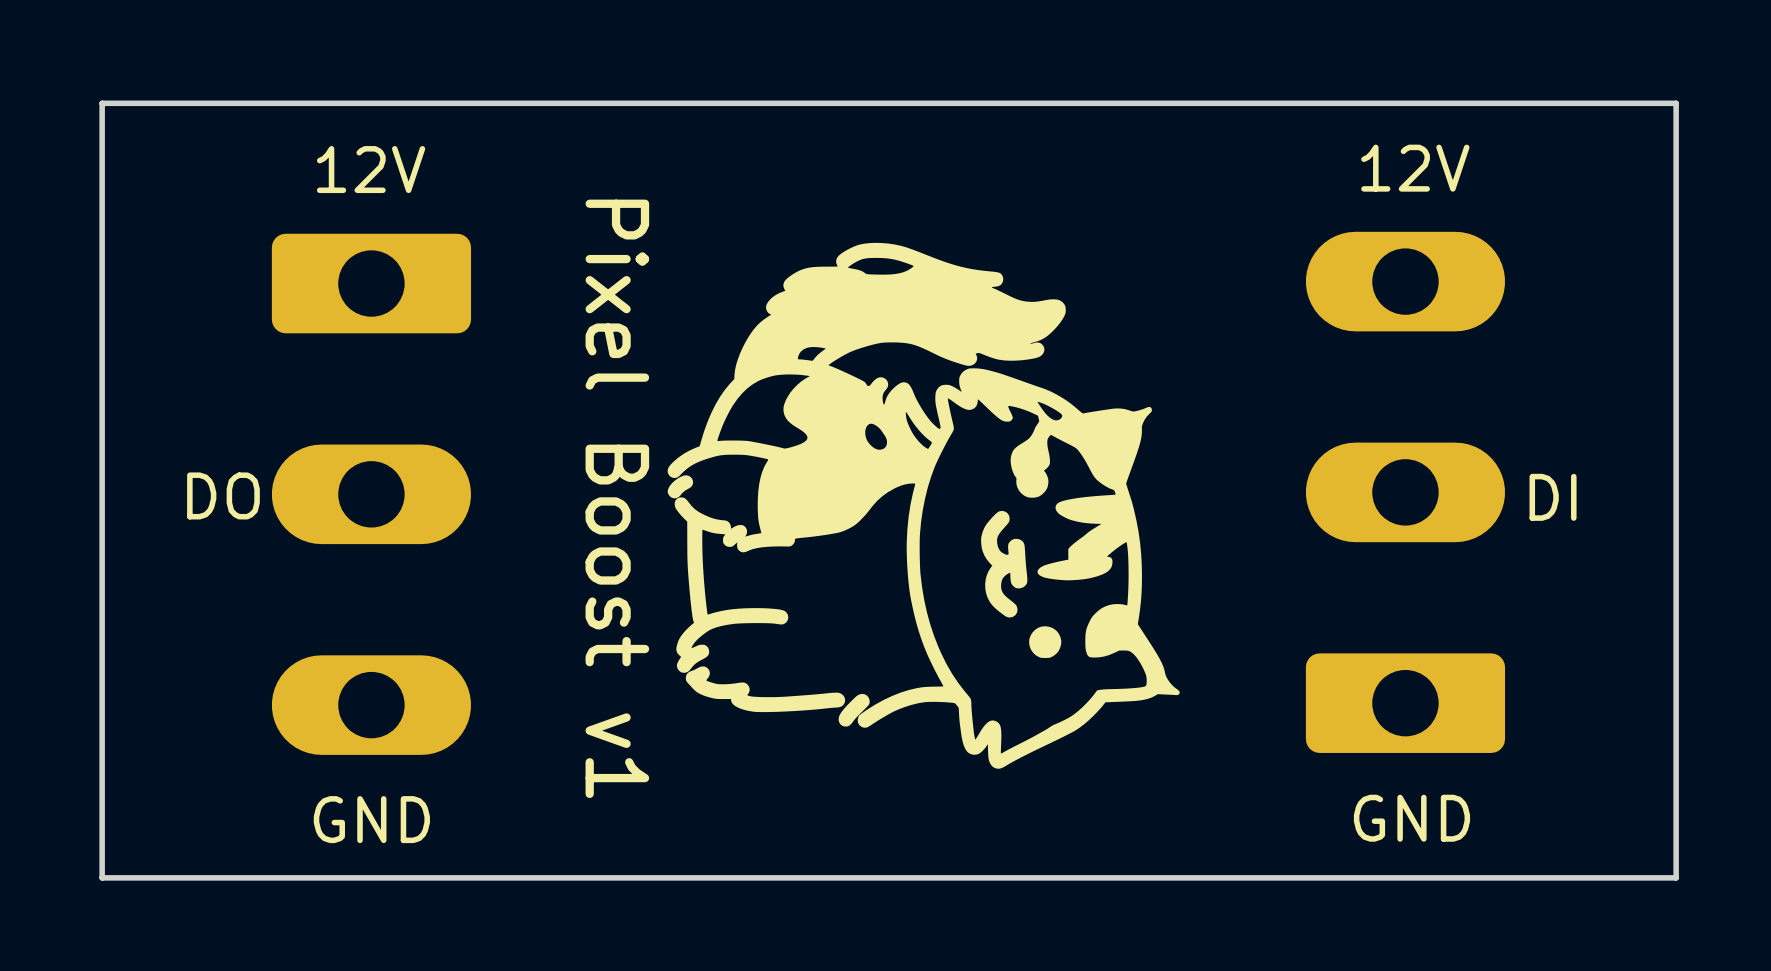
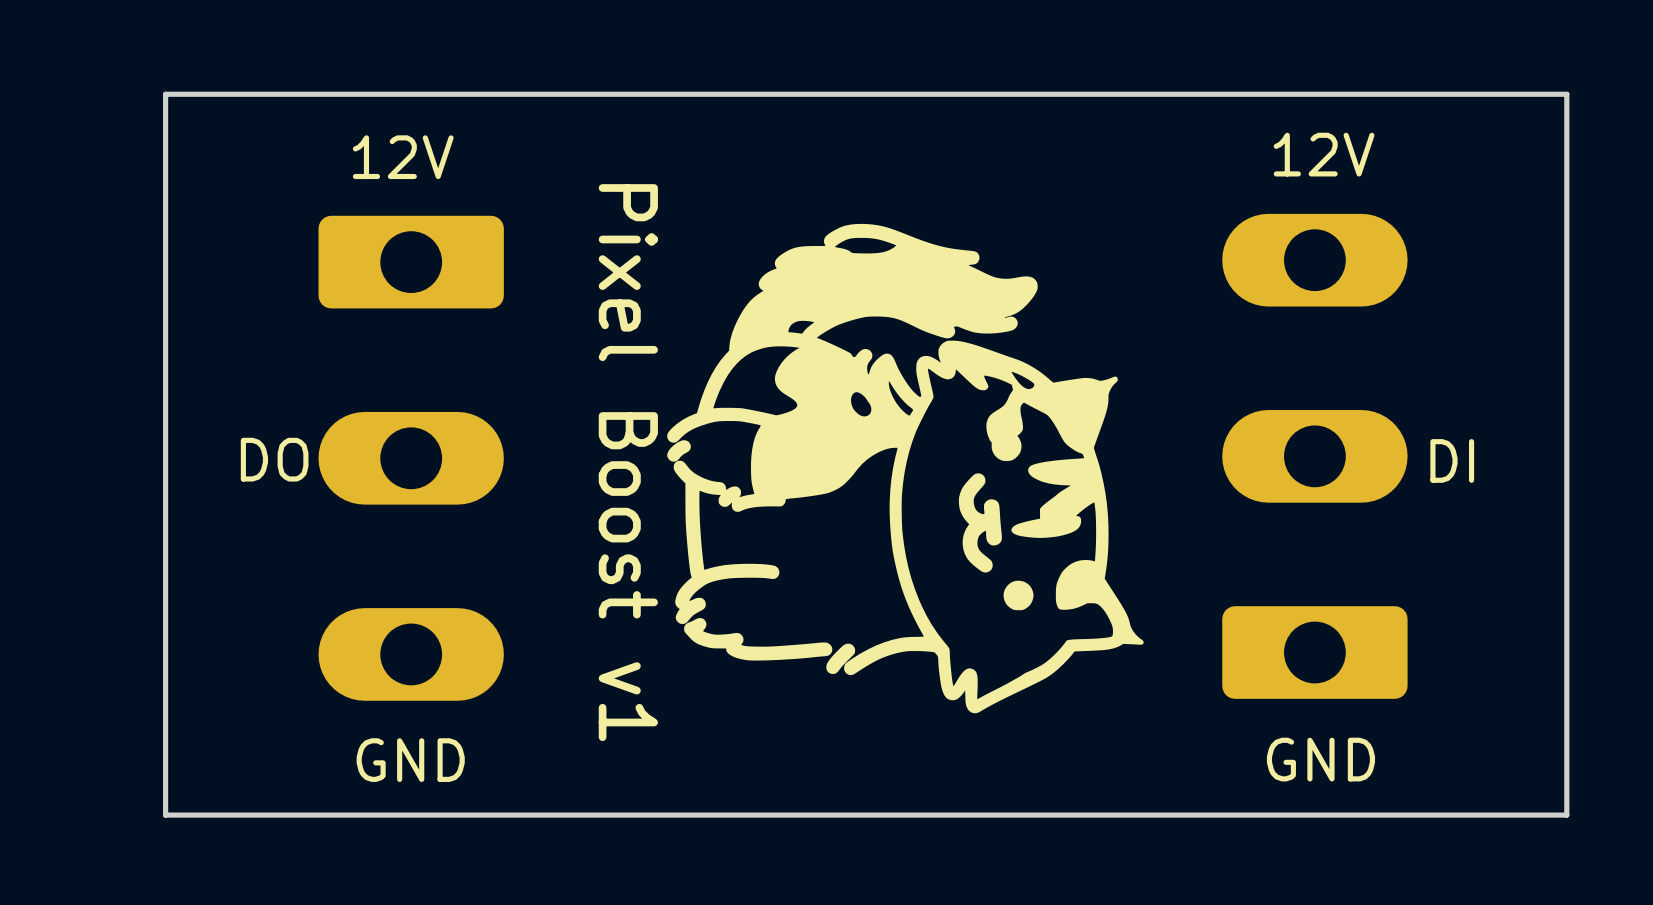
board edge: (170, 103) (102, 103) (102, 877) (170, 877) -> (165, 94) (165, 815)
text position: 12V (371, 169) -> 12V (403, 157)
part position: (371, 494) -> (411, 458)
text position: DO (223, 495) -> DO (274, 459)
text position: Pixel Boost v1 (617, 498) -> Pixel Boost v1 (628, 462)
drawing position: (923, 505) -> (905, 468)
text position: GND (371, 819) -> GND (410, 760)

